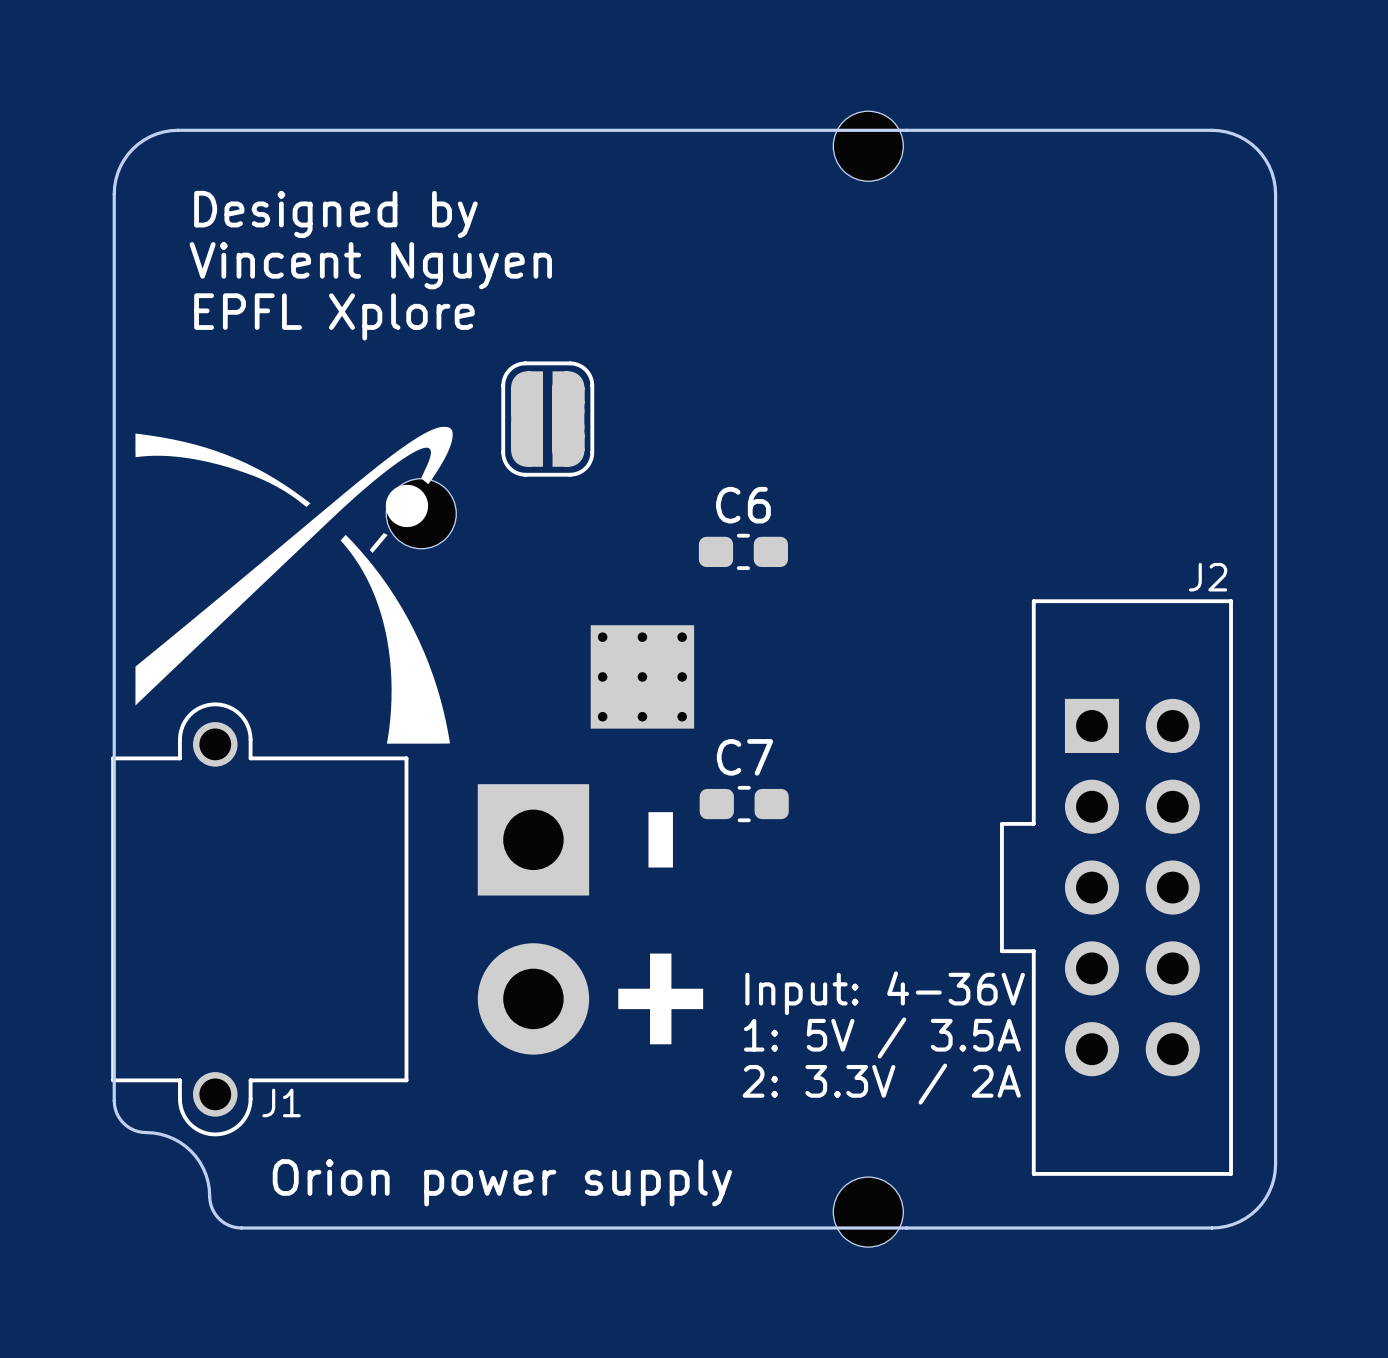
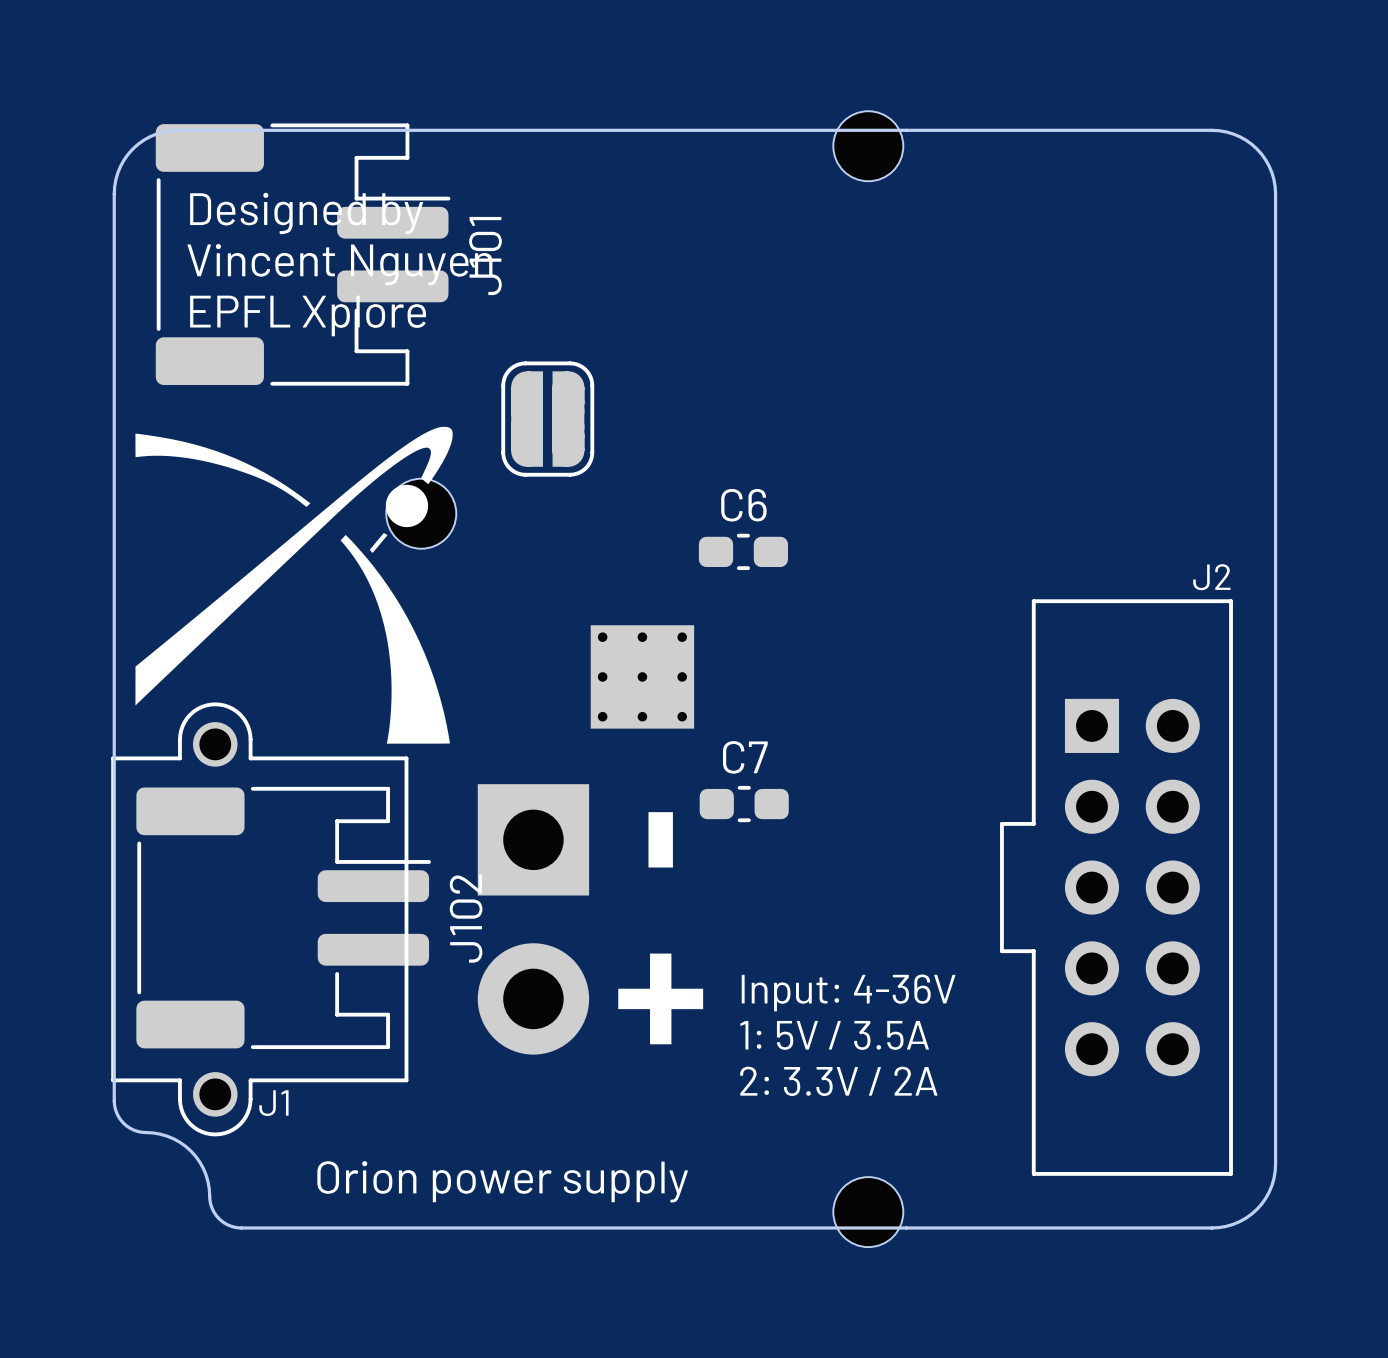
J101: none -> (303, 254)
J102: none -> (283, 917)

